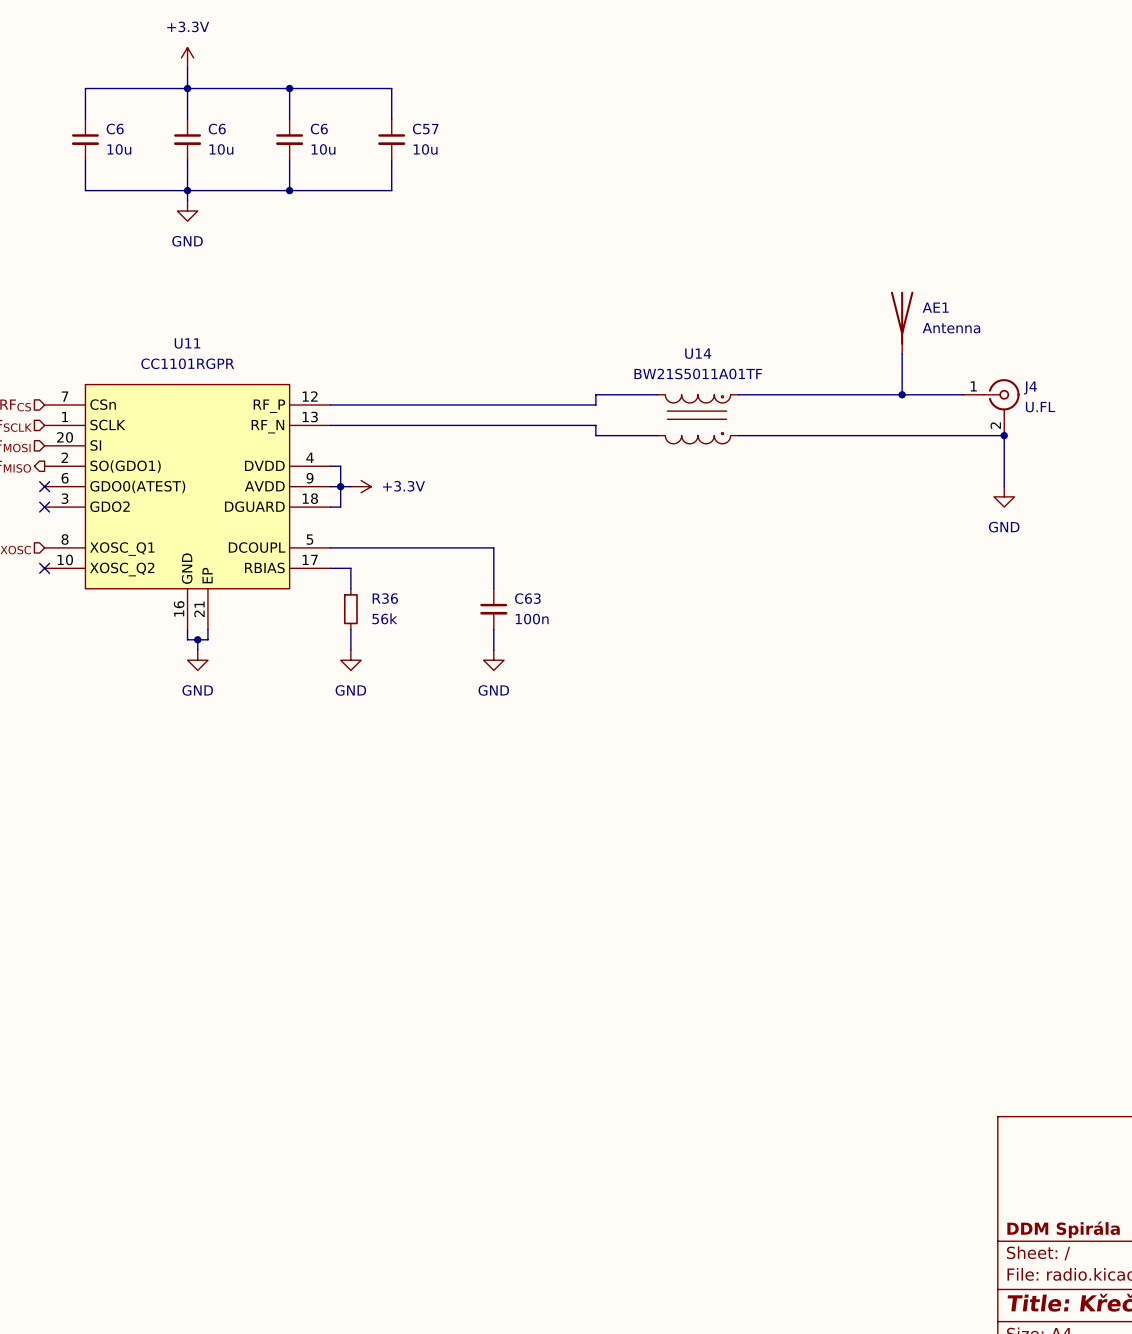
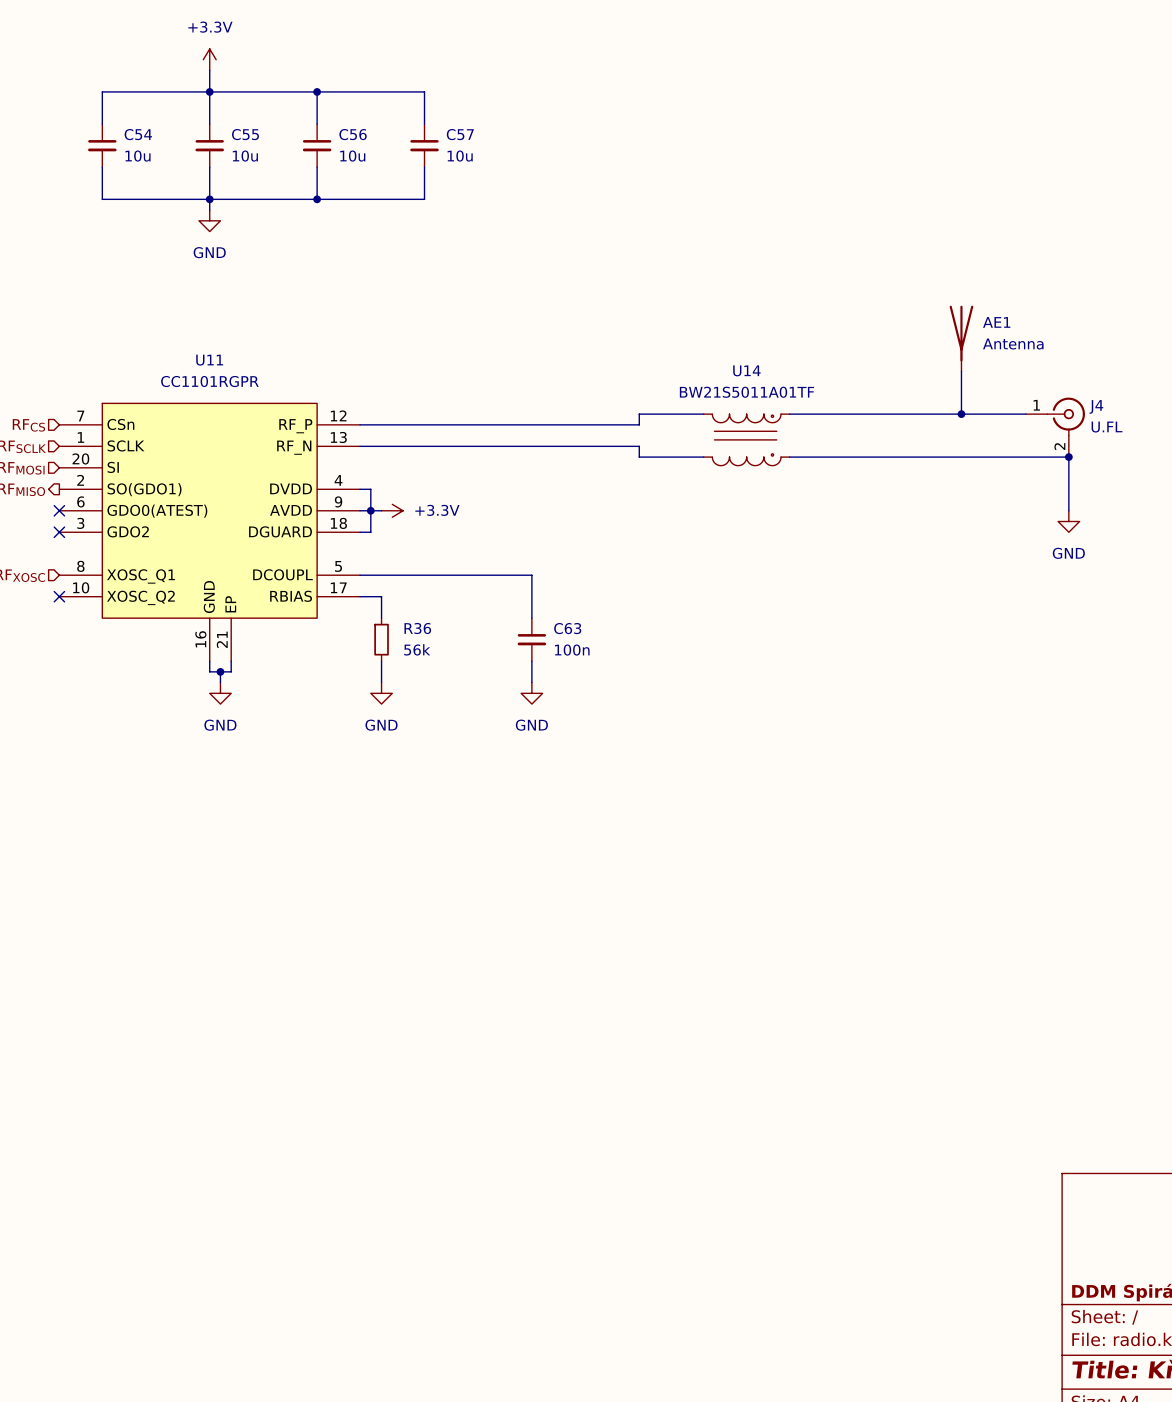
C6 name: C6 (115, 129) -> C54 (138, 134)
C6 name: C6 (217, 129) -> C55 (245, 134)
C6 name: C6 (319, 129) -> C56 (353, 134)

